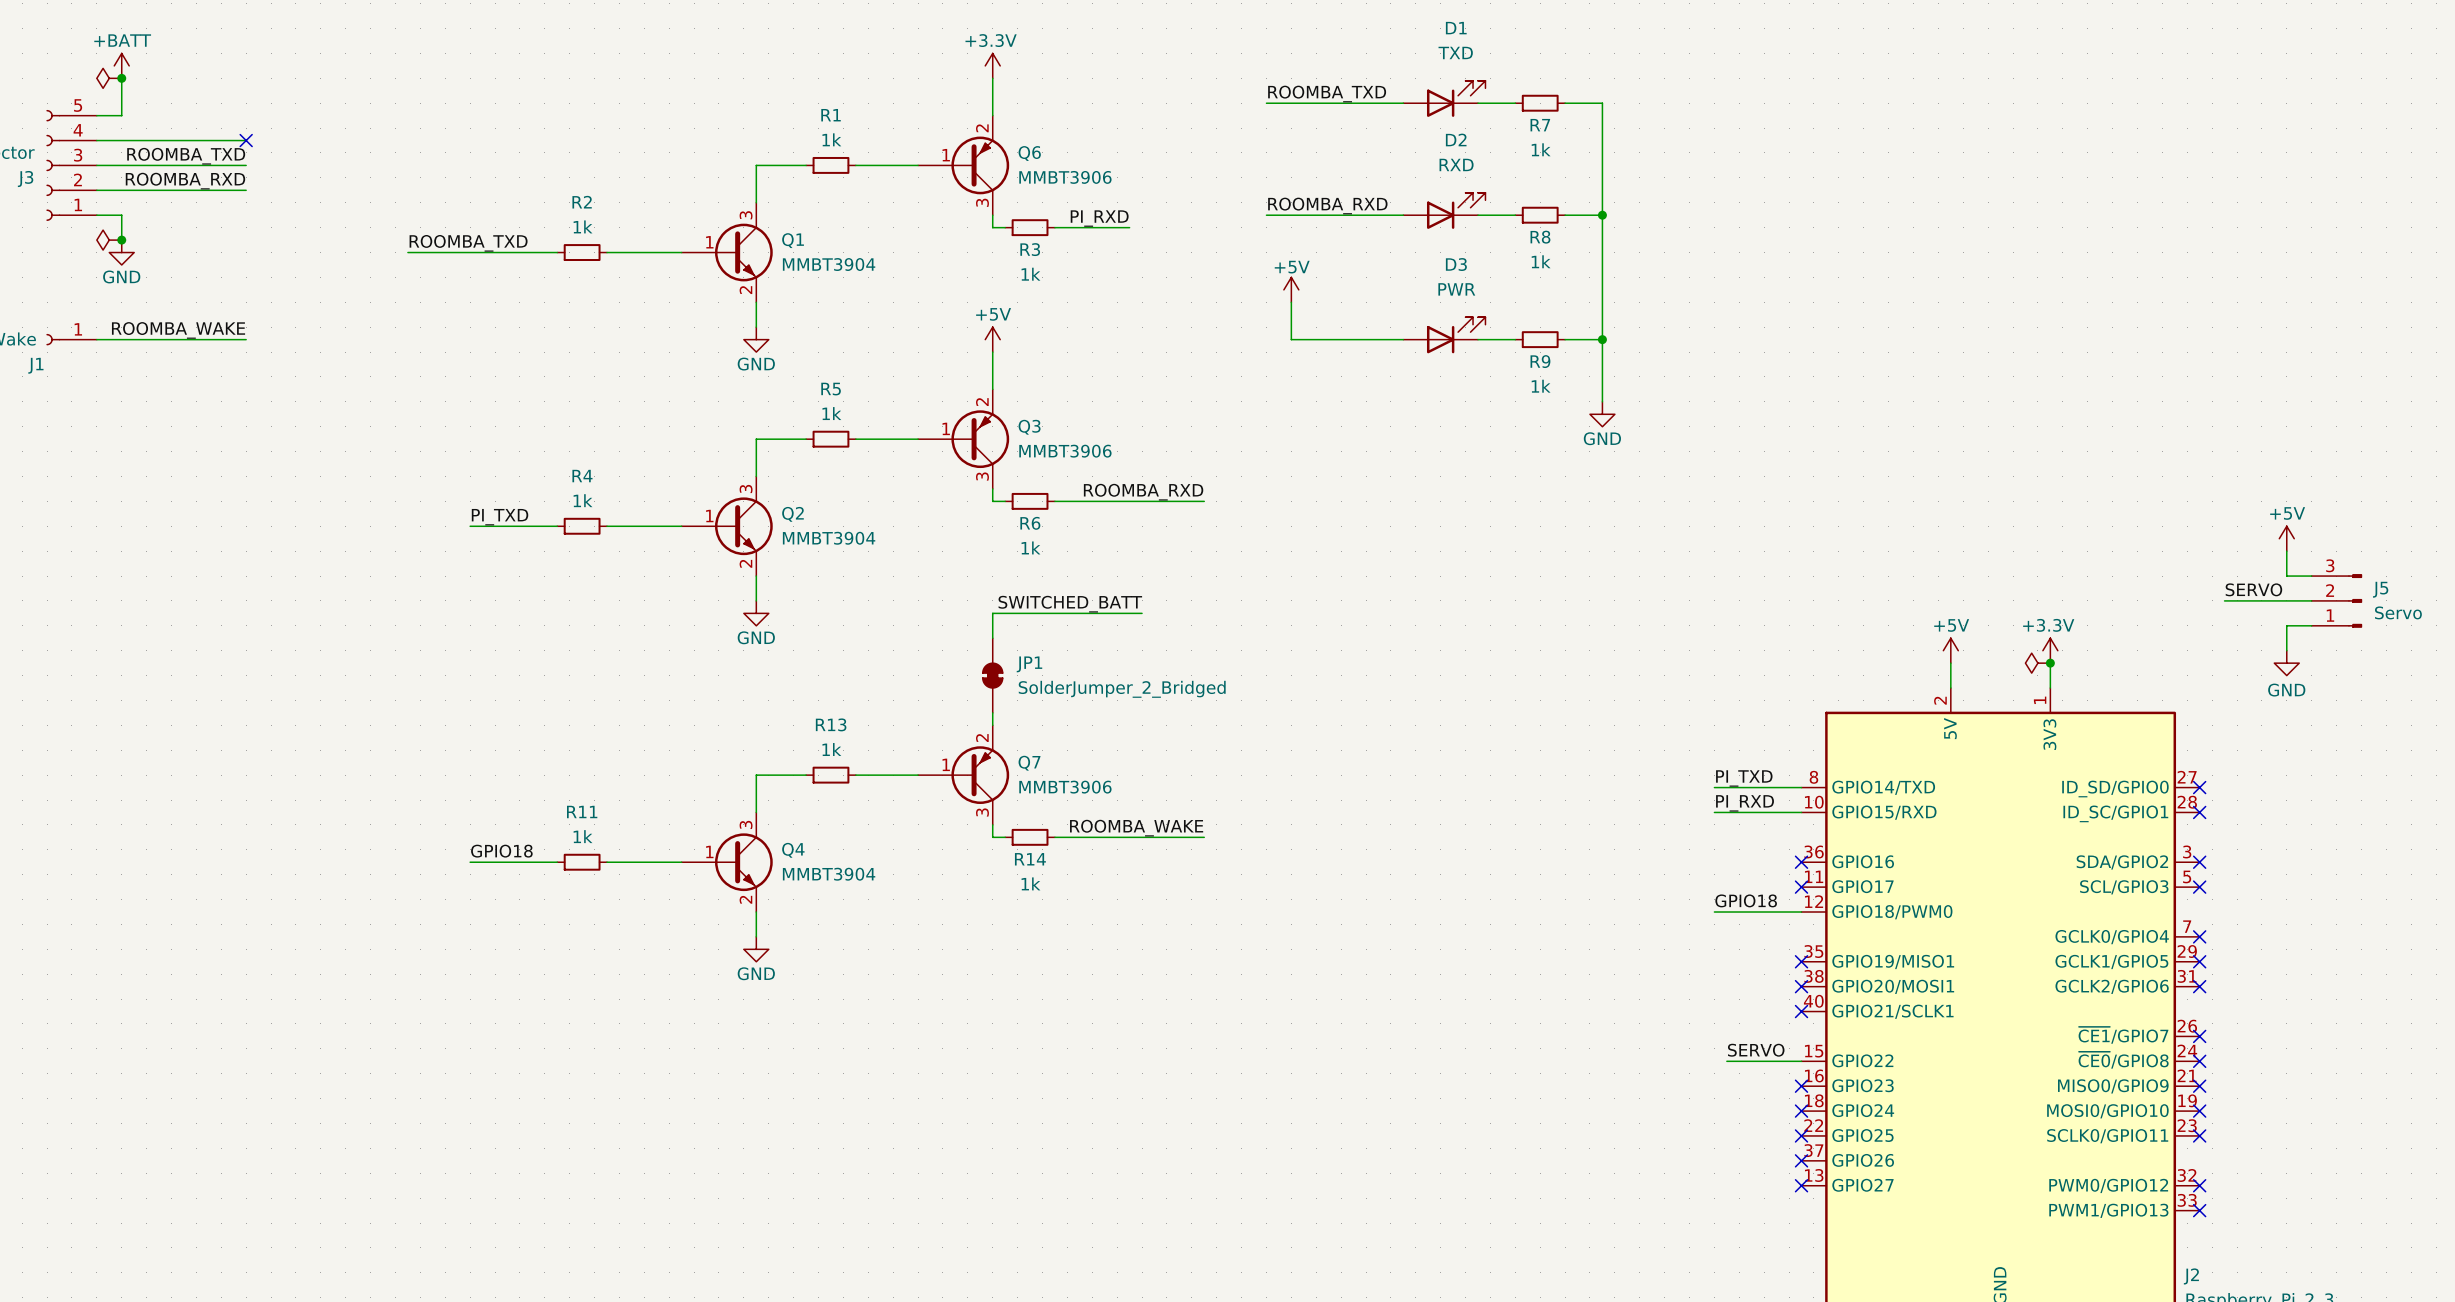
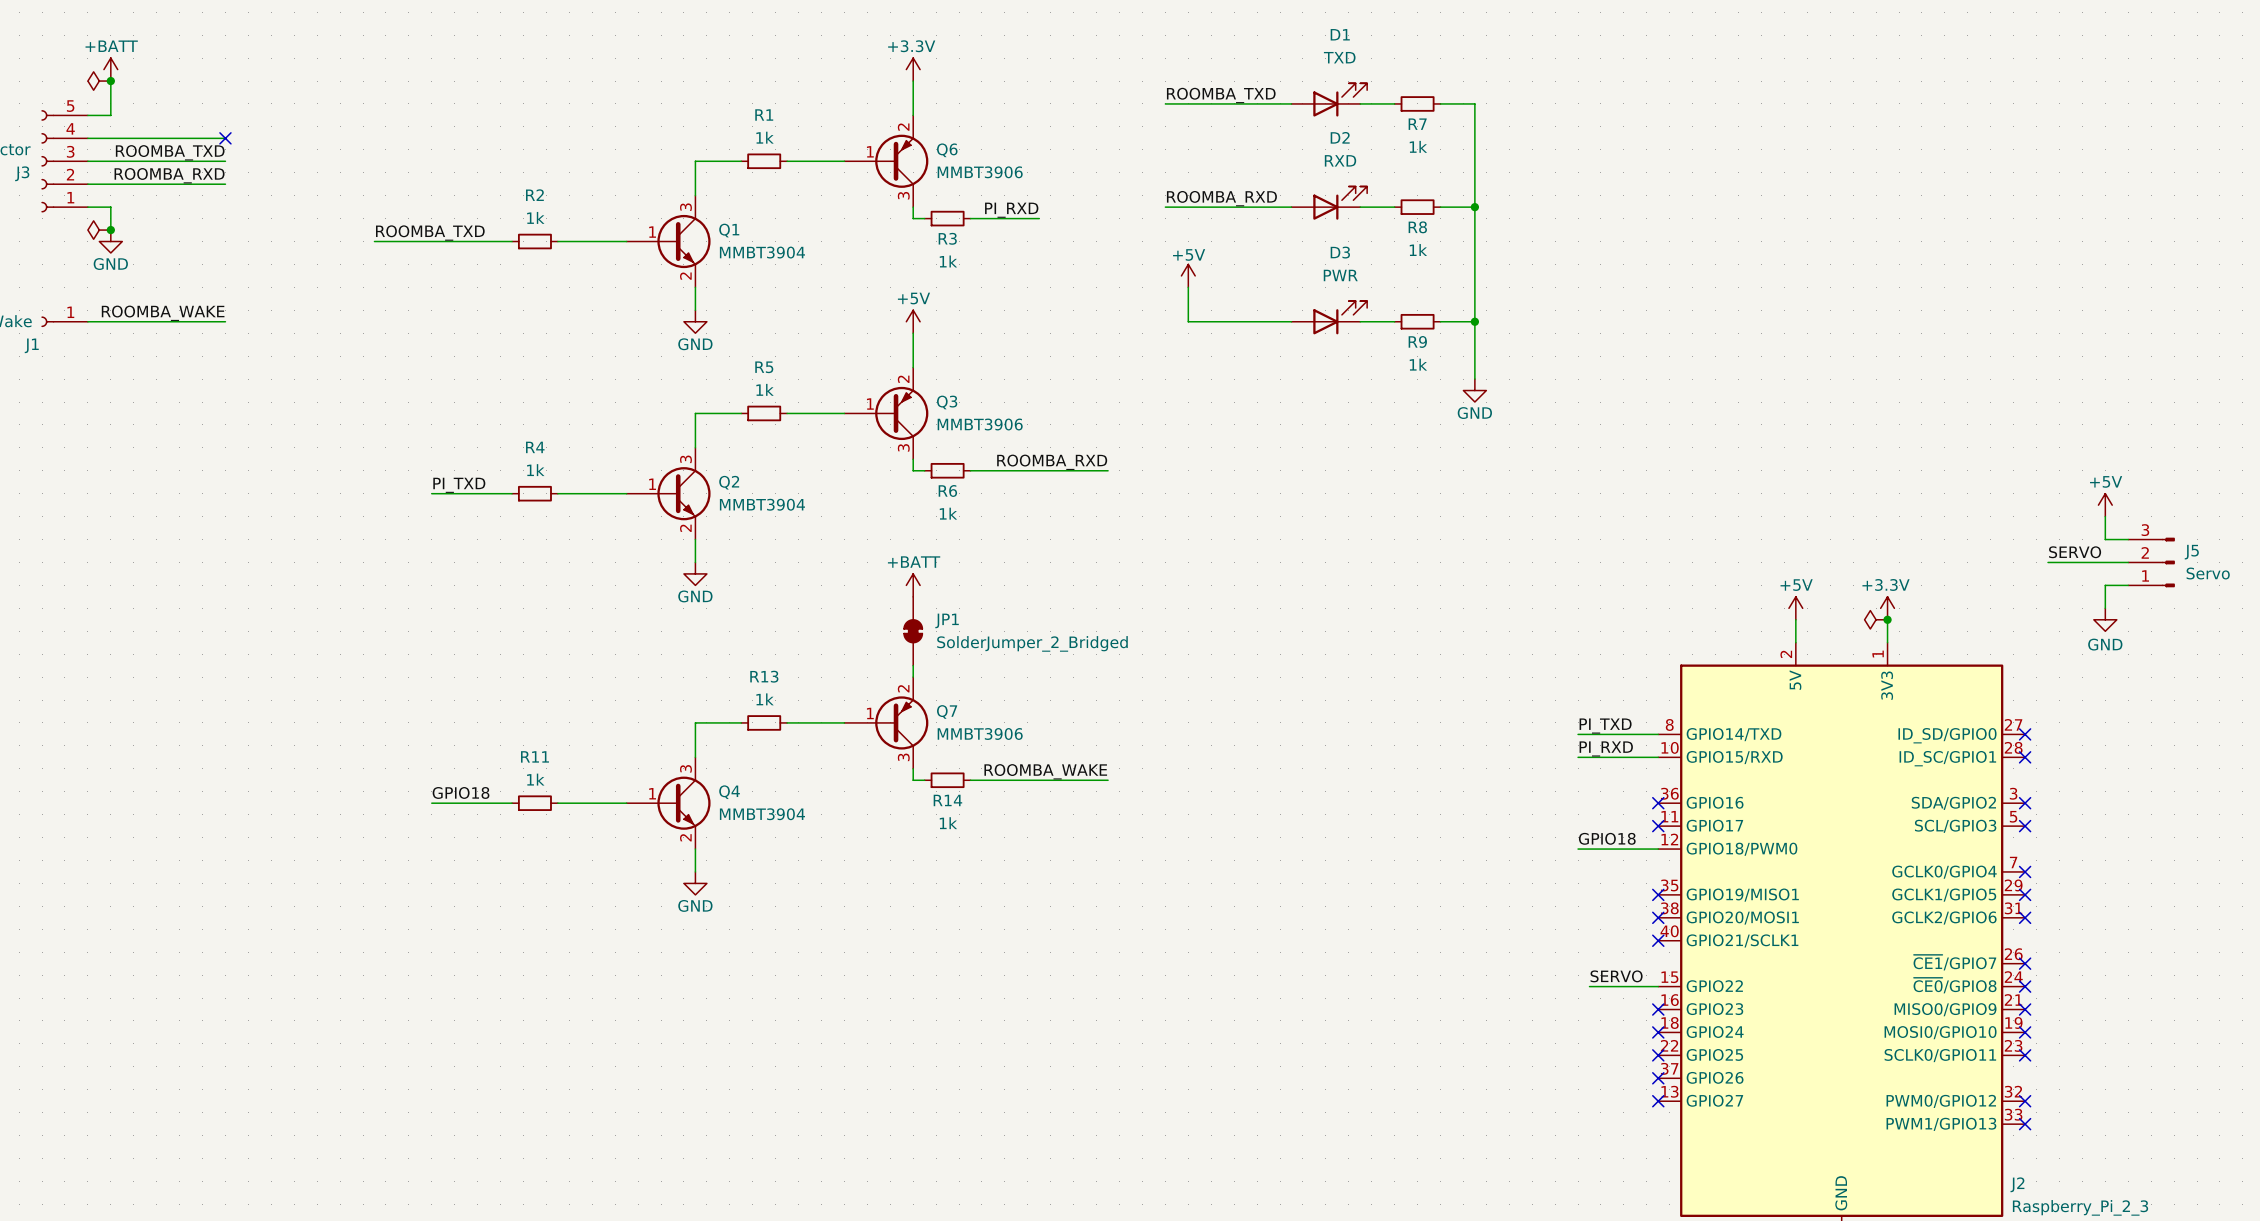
label: SWITCHED_BATT (1070, 604) -> none
wire: (1142, 613) (992, 613) (992, 638) -> none
power symbol: none -> +BATT (913, 585)

